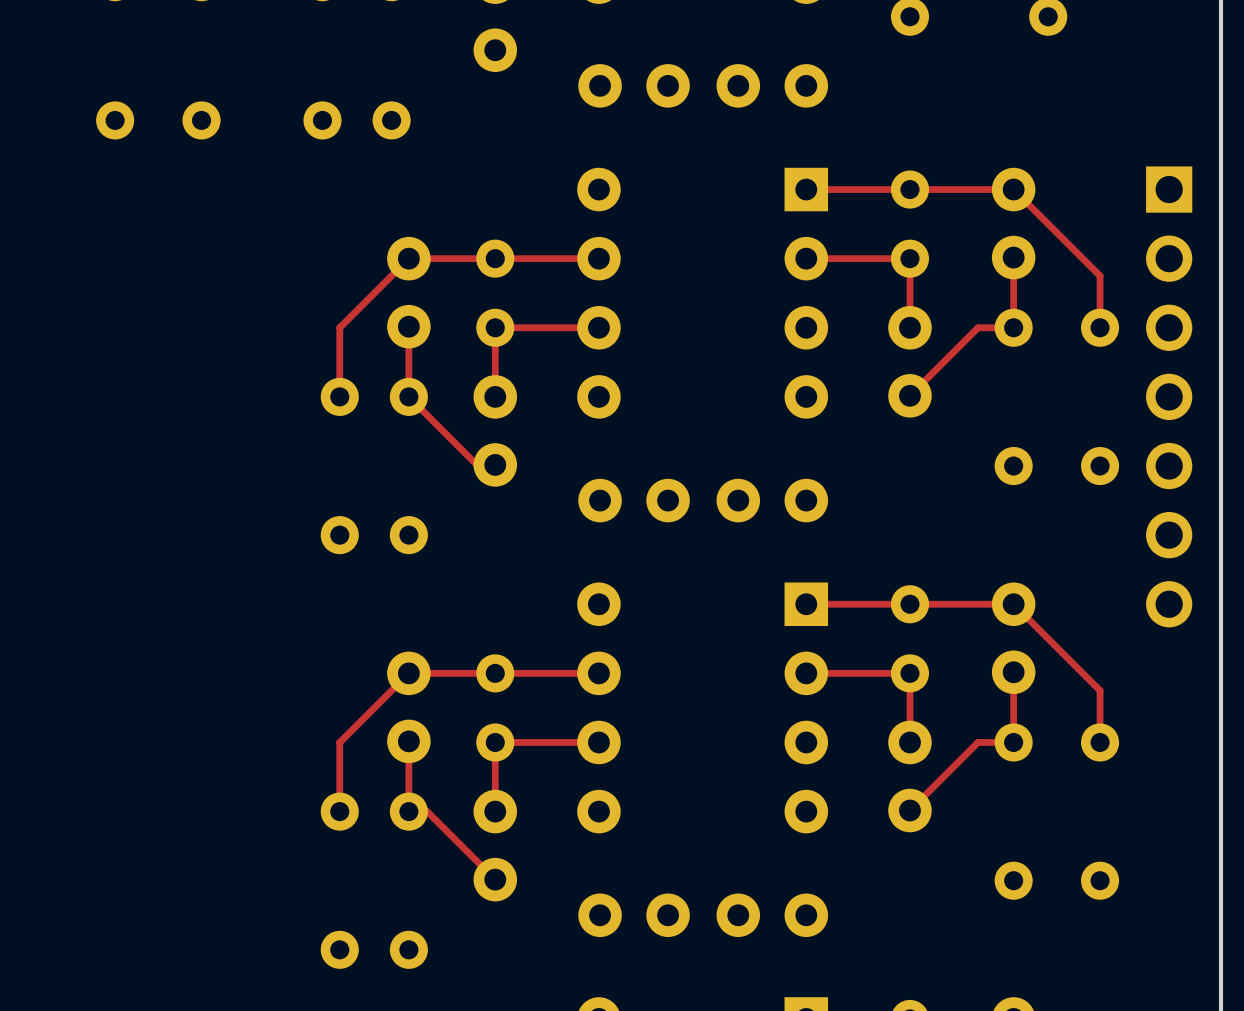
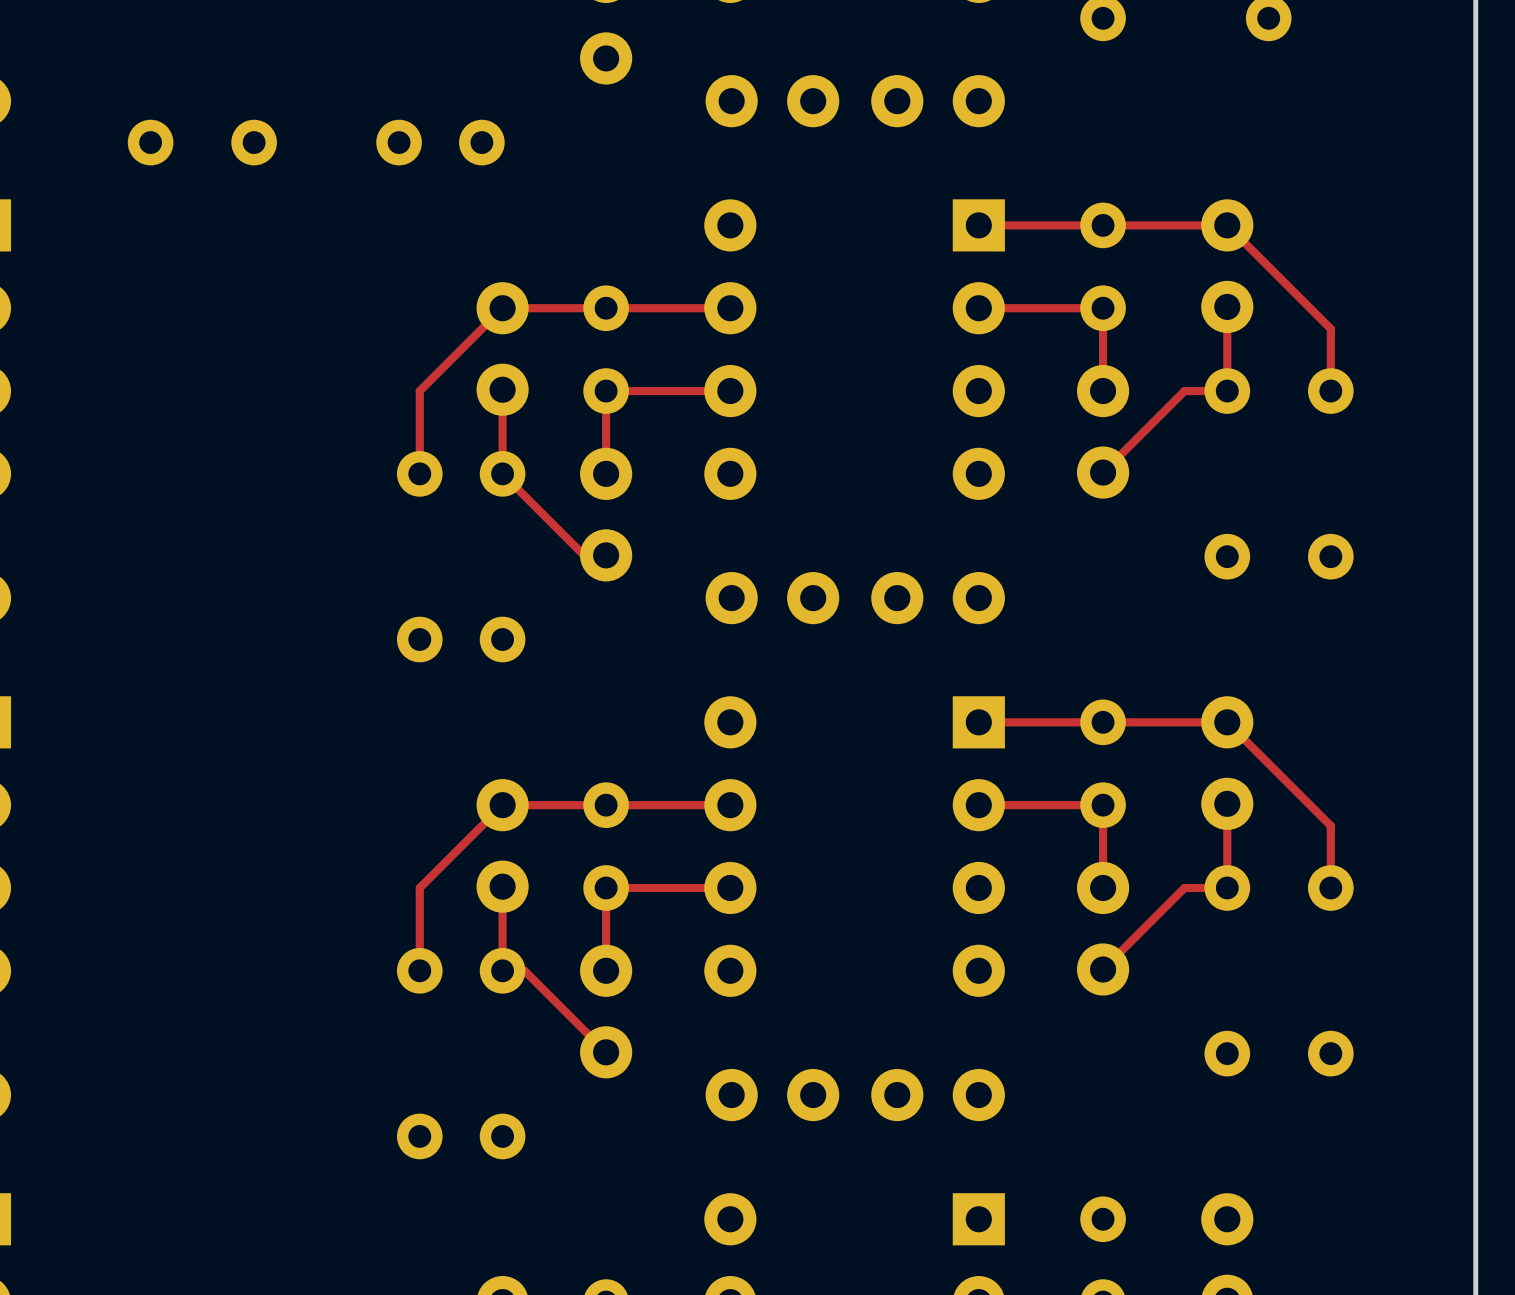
part: (1169, 396) -> none

